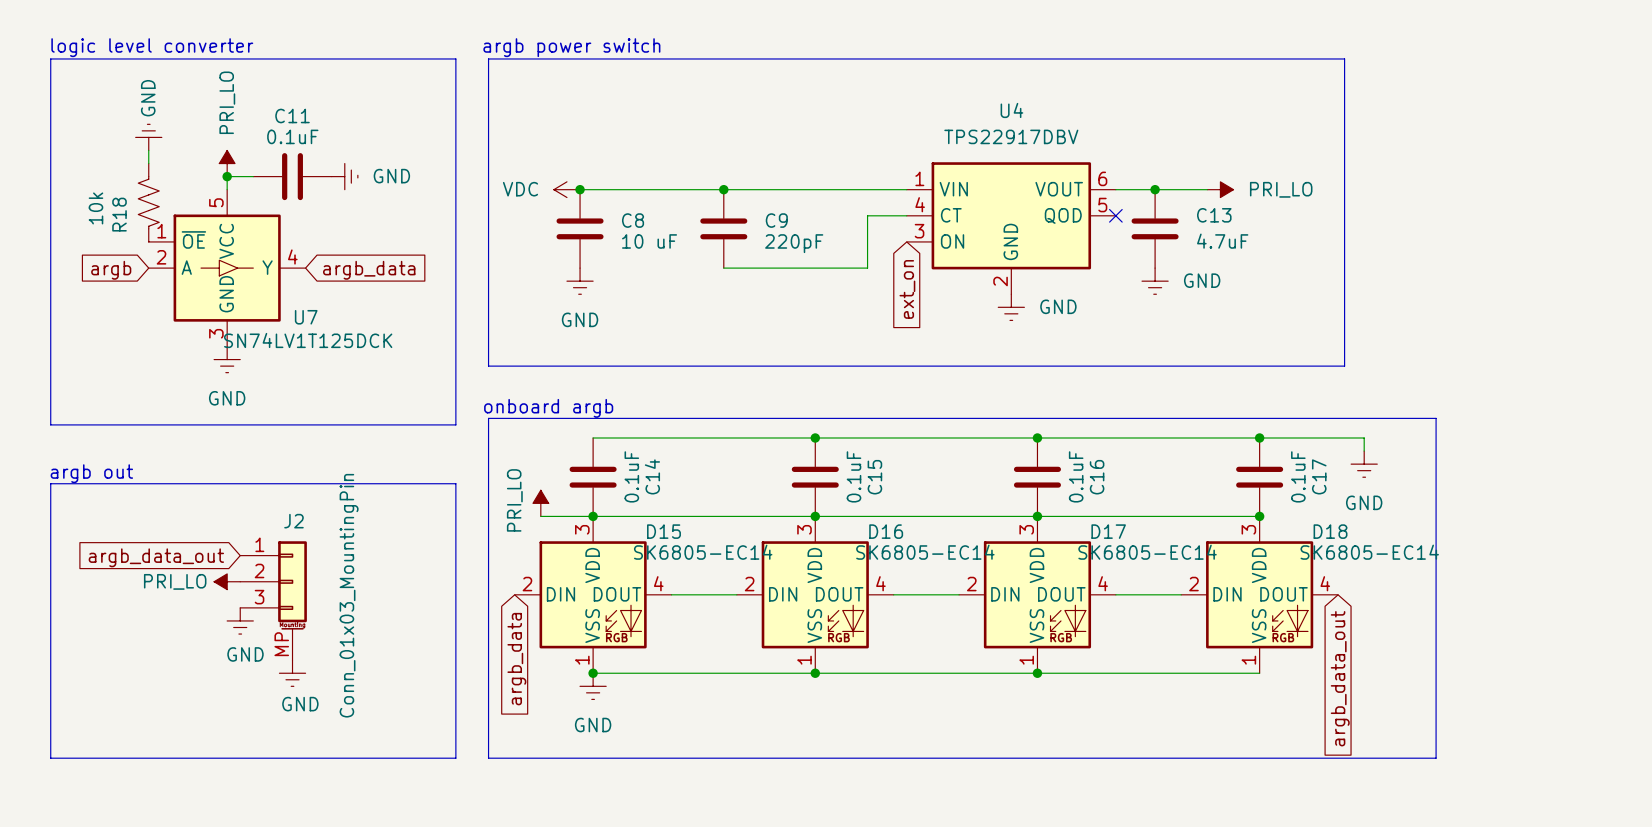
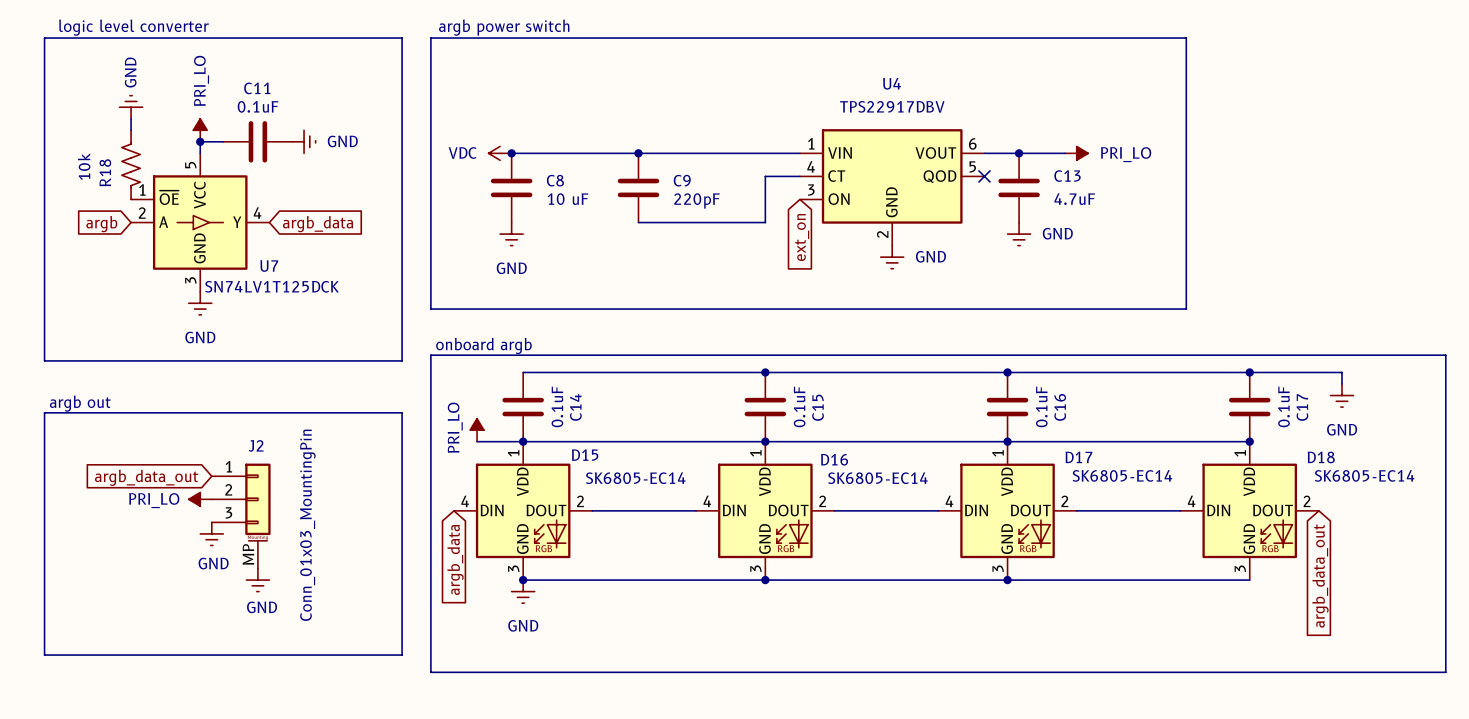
line: (1436, 418) (1436, 758) (488, 758) -> (1267, 355) (1445, 355) (1445, 672) (430, 672) (430, 655)
junction: (815, 437) -> none
junction: none -> (765, 372)
junction: (1037, 437) -> none
junction: none -> (1007, 372)
junction: (1259, 437) -> none
wire: (1364, 437) (1364, 451) -> (1203, 372) (1341, 372) (1341, 384)
junction: none -> (1249, 372)
power symbol position: GND (1364, 464) -> GND (1341, 395)
C15 position: (815, 477) -> (765, 407)
C16 position: (1037, 477) -> (1007, 407)
C17 position: (1259, 477) -> (1249, 407)
junction: (815, 516) -> none
junction: none -> (765, 441)
junction: (1037, 516) -> none
junction: none -> (1007, 441)
wire: none -> (1111, 441) (1249, 441)
junction: (1259, 516) -> none
junction: none -> (1249, 441)
D15 pin number: 3 (582, 529) -> 1 (513, 453)
D16 pin number: 3 (804, 529) -> 1 (755, 453)
D17 pin number: 3 (1026, 529) -> 1 (998, 453)
D18 pin number: 3 (1248, 529) -> 1 (1240, 453)
D16 name position: D16 (886, 531) -> D16 (834, 459)
D17 name position: D17 (1108, 531) -> D17 (1078, 457)
D18 name position: D18 (1330, 531) -> D18 (1321, 457)
D15 value position: SK6805-EC14 (703, 552) -> SK6805-EC14 (635, 478)
D16 value position: SK6805-EC14 (925, 552) -> SK6805-EC14 (877, 478)
D17 value position: SK6805-EC14 (1147, 552) -> SK6805-EC14 (1122, 475)
D18 value position: SK6805-EC14 (1369, 552) -> SK6805-EC14 (1364, 475)
D15 pin number: 4 (658, 583) -> 2 (580, 501)
D16 pin number: 4 (880, 583) -> 2 (822, 501)
D17 pin number: 4 (1103, 583) -> 2 (1064, 501)
D18 pin number: 4 (1325, 583) -> 2 (1307, 501)
D15 pin number: 2 (527, 584) -> 4 (465, 501)
D16 pin number: 2 (749, 584) -> 4 (707, 501)
D17 pin number: 2 (971, 584) -> 4 (949, 501)
D18 pin number: 2 (1193, 584) -> 4 (1191, 501)
D16 position: (815, 594) -> (765, 510)
D17 position: (1037, 594) -> (1007, 510)
D18 position: (1259, 594) -> (1249, 510)
D15 pin name: VSS (592, 626) -> GND (522, 539)
D16 pin name: VSS (814, 626) -> GND (764, 539)
D17 pin name: VSS (1036, 626) -> GND (1007, 539)
D18 pin name: VSS (1259, 626) -> GND (1249, 539)
D15 pin number: 1 (582, 660) -> 3 (513, 568)
D16 pin number: 1 (804, 660) -> 3 (755, 568)
D17 pin number: 1 (1026, 660) -> 3 (998, 568)
D18 pin number: 1 (1248, 660) -> 3 (1240, 568)
junction position: (815, 673) -> (765, 580)
junction: (1037, 673) -> none
junction: none -> (1007, 580)
wire: none -> (1111, 580) (1249, 580)
global label position: argb_data_out (1340, 678) -> argb_data_out (1320, 576)

